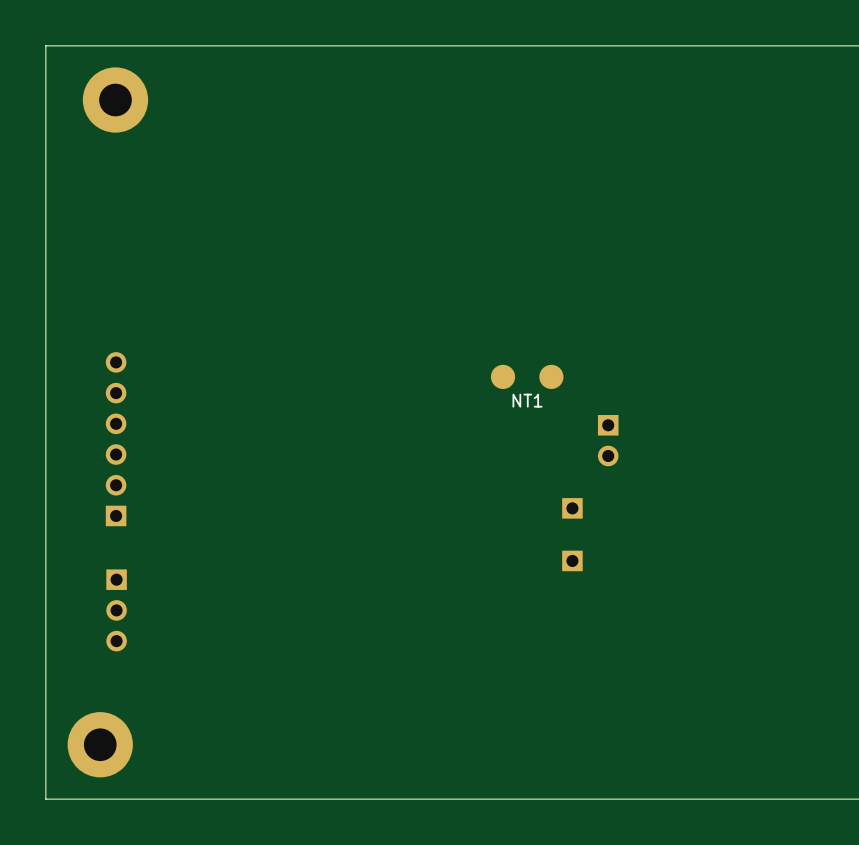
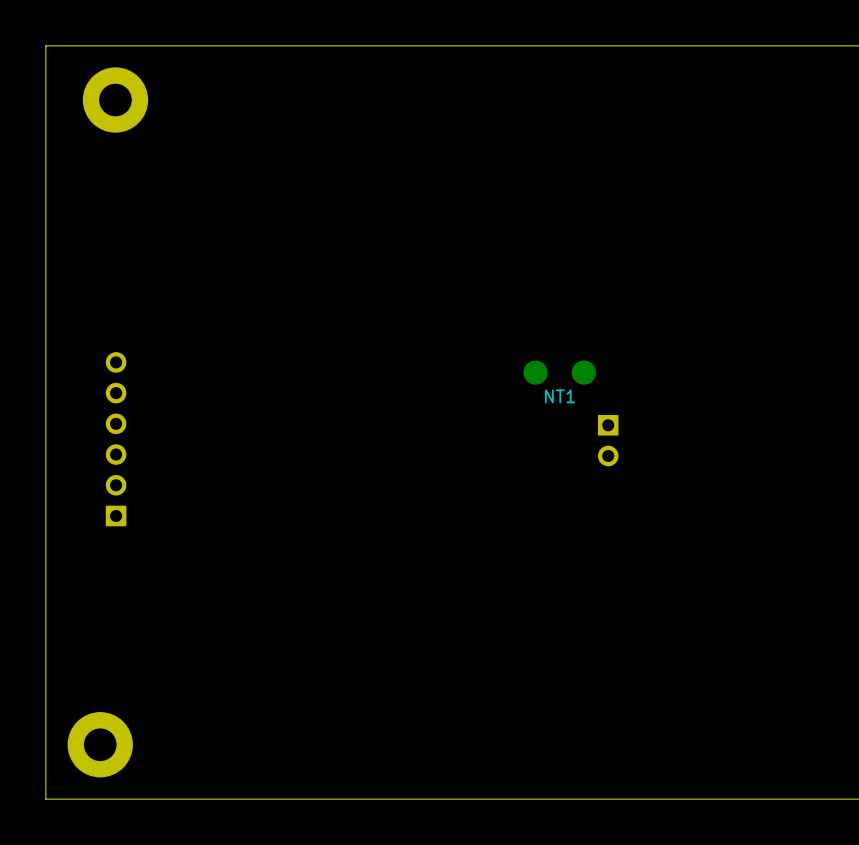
NT1 position: (527, 376) -> (559, 372)
part: (572, 508) -> none
part: (572, 560) -> none
part: (116, 610) -> none

